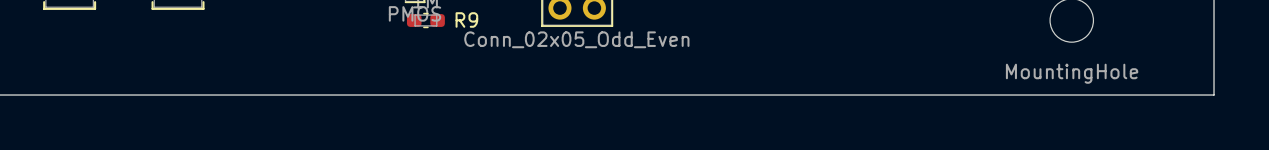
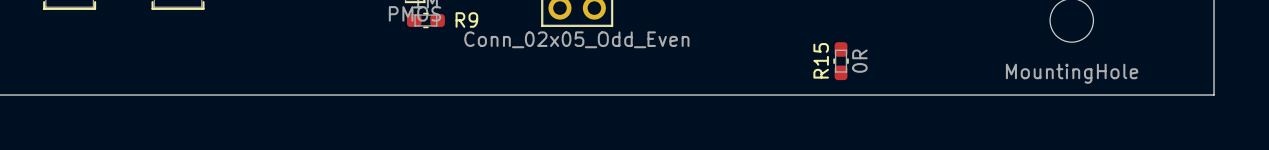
R15: none -> 0R (841, 61)

